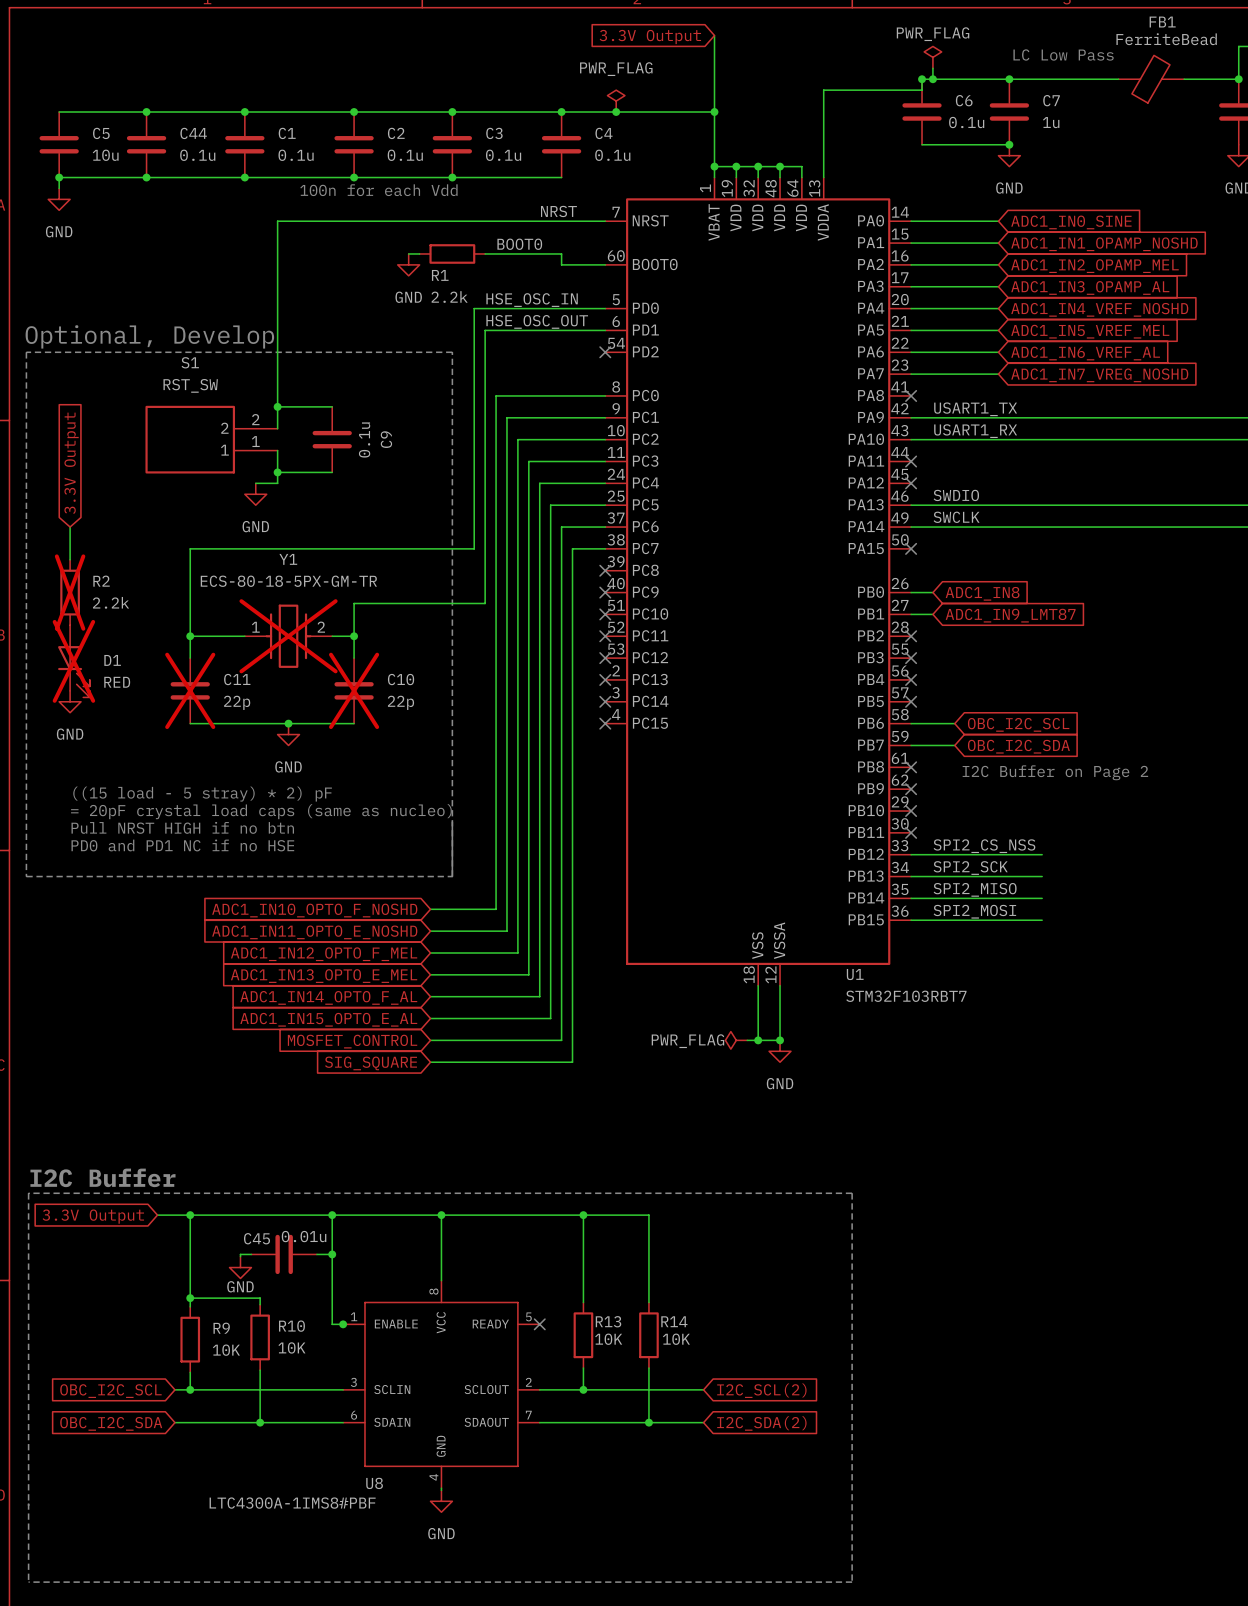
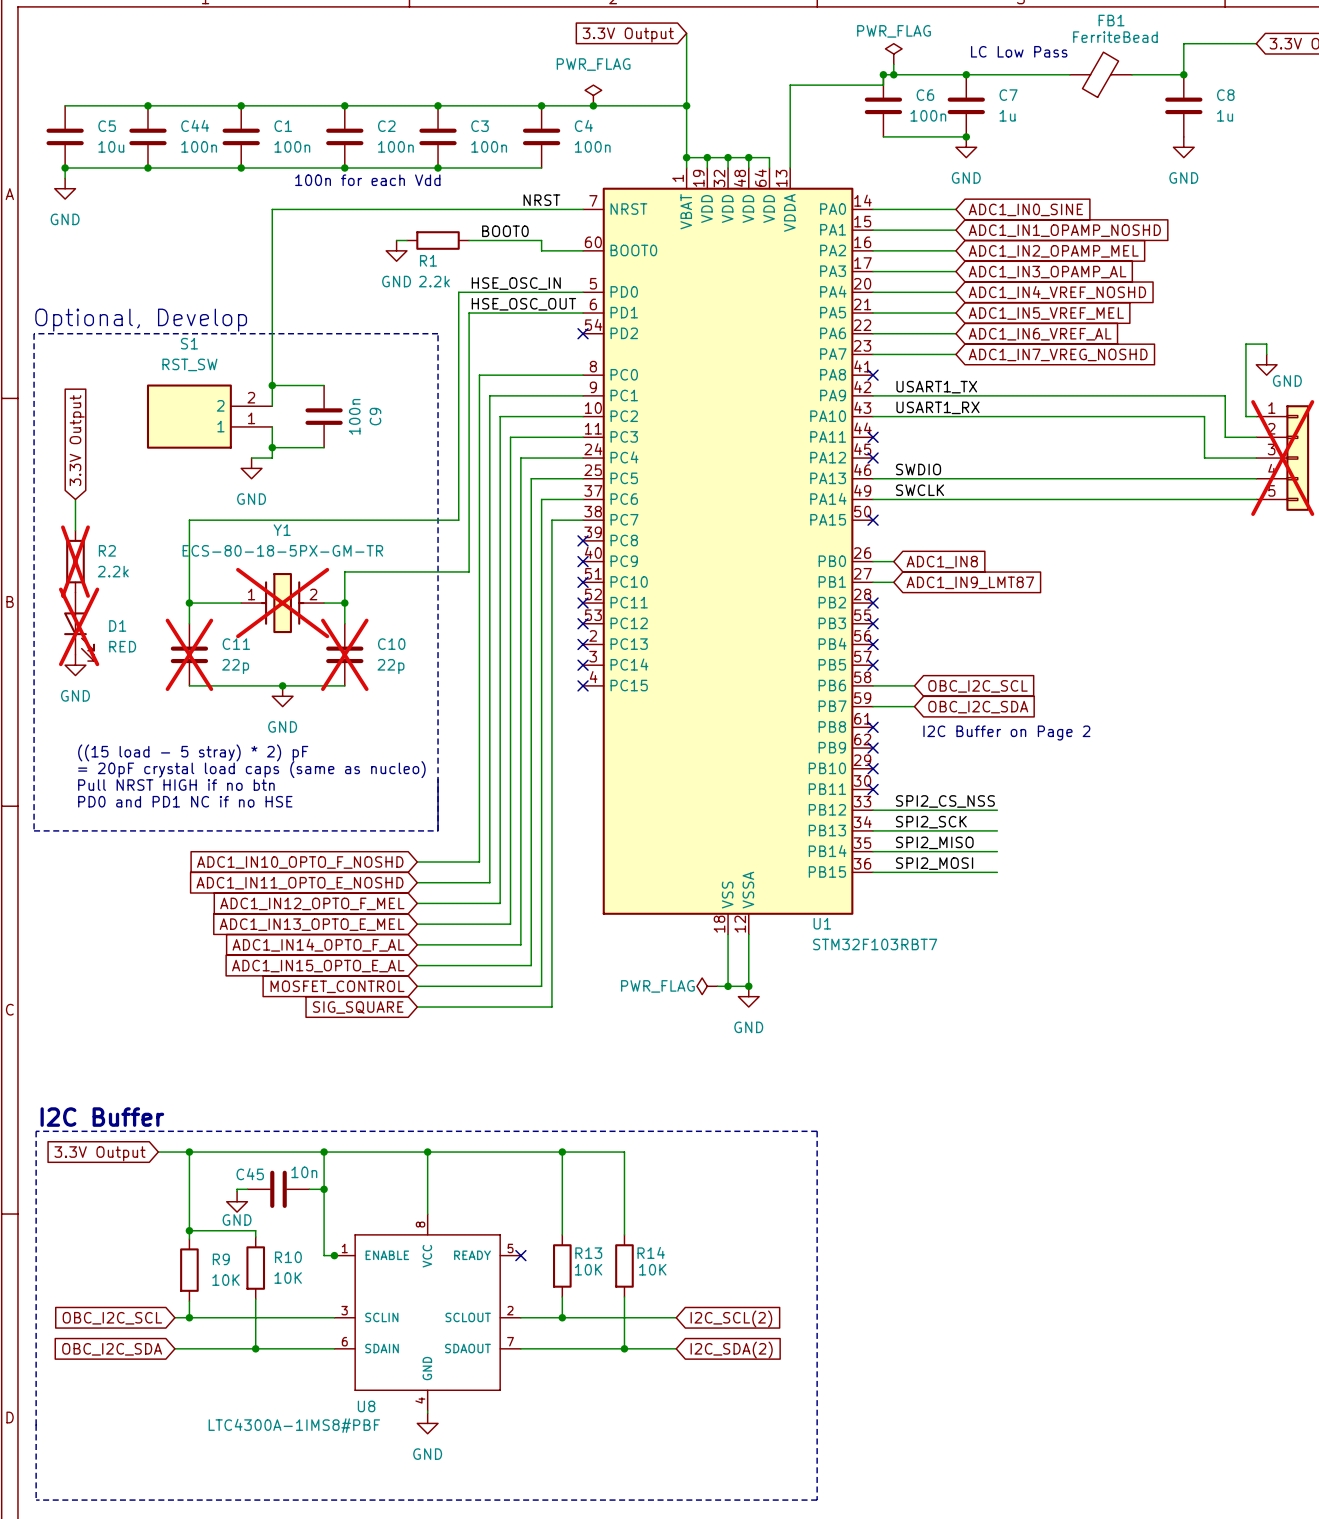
C6 value: 0.1u (966, 122) -> 100n (928, 115)
C44 value: 0.1u (197, 155) -> 100n (199, 146)
C1 value: 0.1u (296, 155) -> 100n (292, 146)
C2 value: 0.1u (405, 155) -> 100n (395, 146)
C3 value: 0.1u (503, 155) -> 100n (489, 146)
C4 value: 0.1u (612, 155) -> 100n (592, 146)
C9 value: 0.1u (364, 439) -> 100n (354, 416)
C45 value: 0.01u (304, 1236) -> 10n (304, 1172)

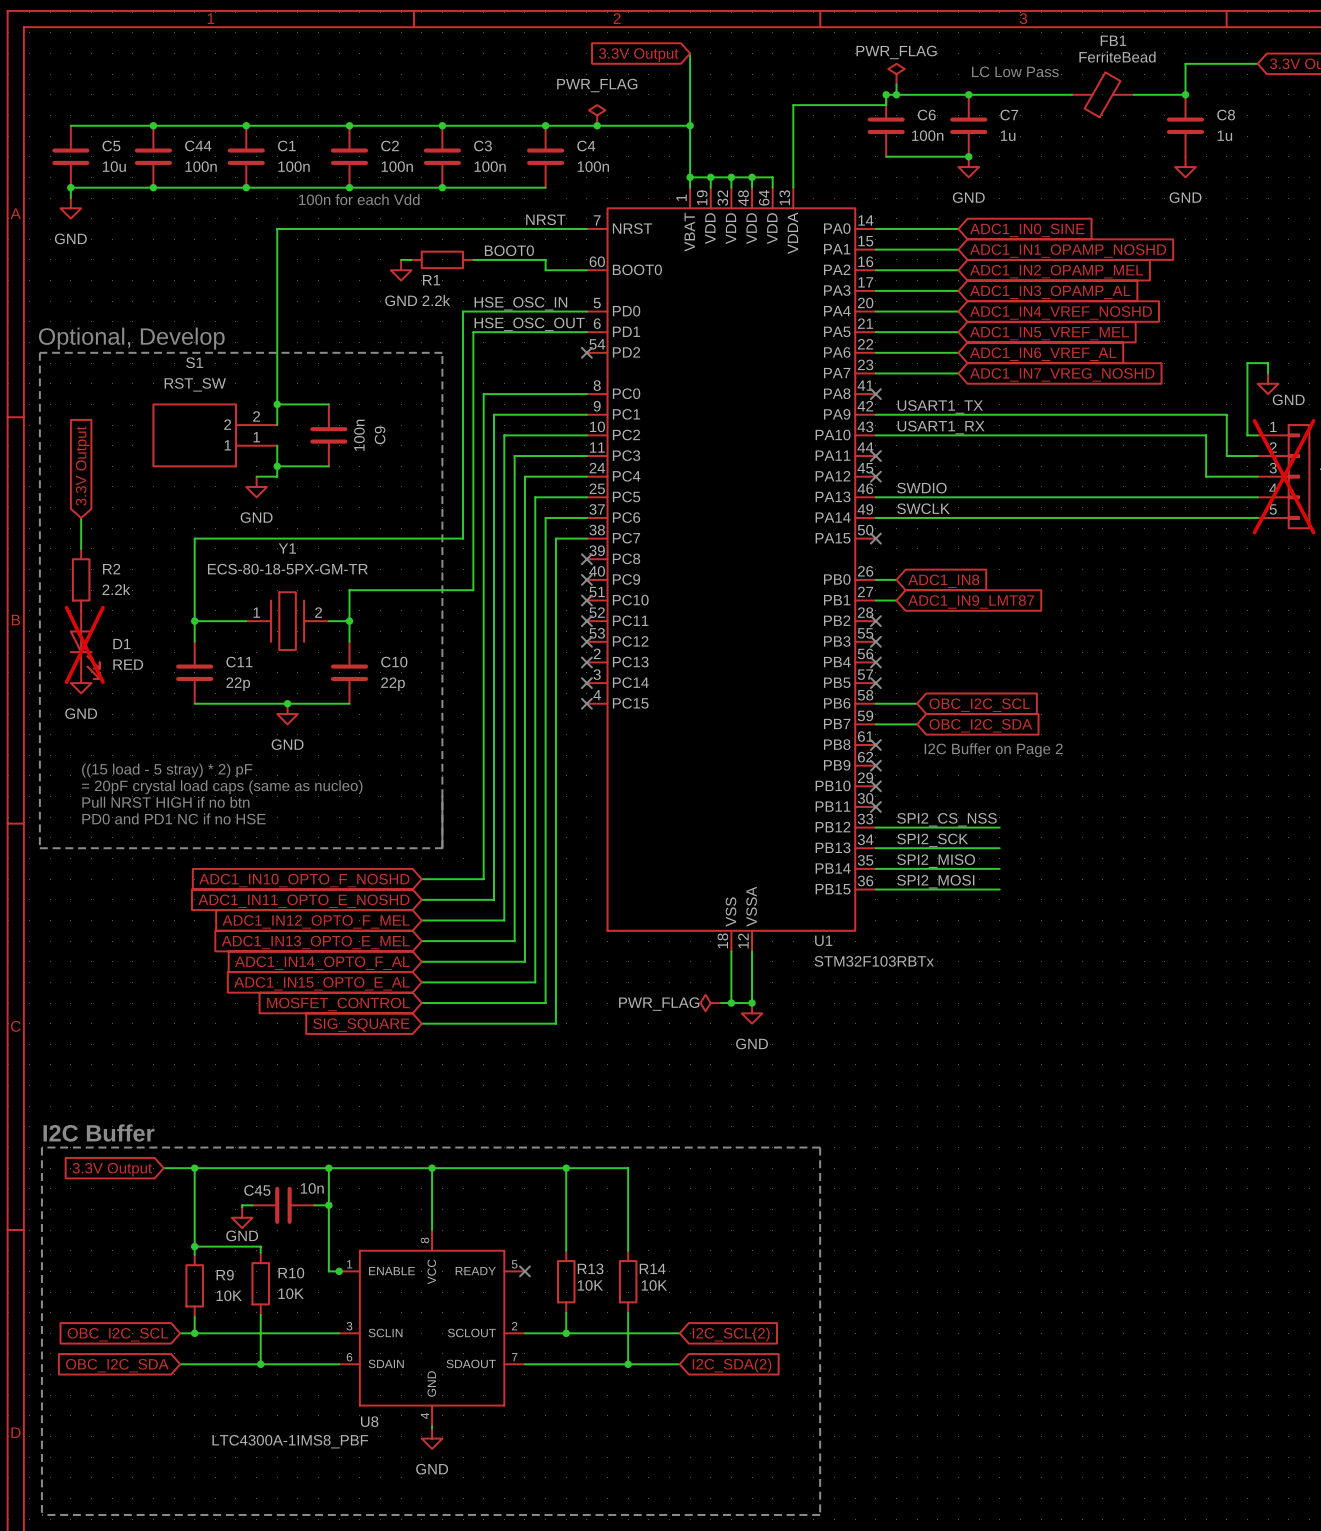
R2 do-not-place cross: (75, 561) -> none
Y1 do-not-place cross: (282, 603) -> none
C11 do-not-place cross: (189, 654) -> none
C10 do-not-place cross: (344, 654) -> none
U1 value: STM32F103RBT7 (875, 944) -> STM32F103RBTx (874, 961)
U8 value: LTC4300A-1IMS8#PBF (294, 1425) -> LTC4300A-1IMS8_PBF (290, 1441)

